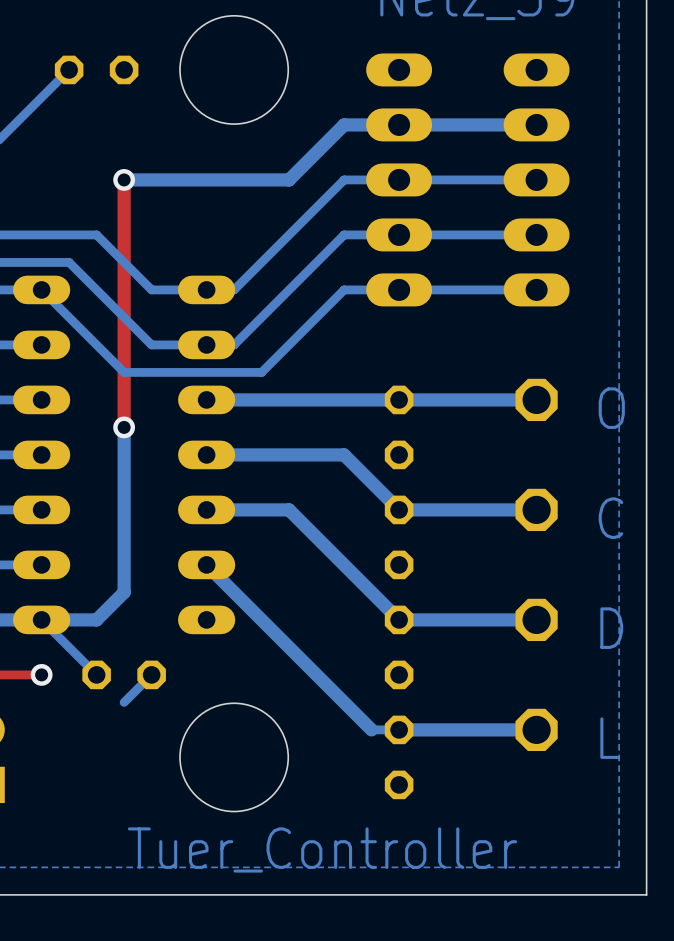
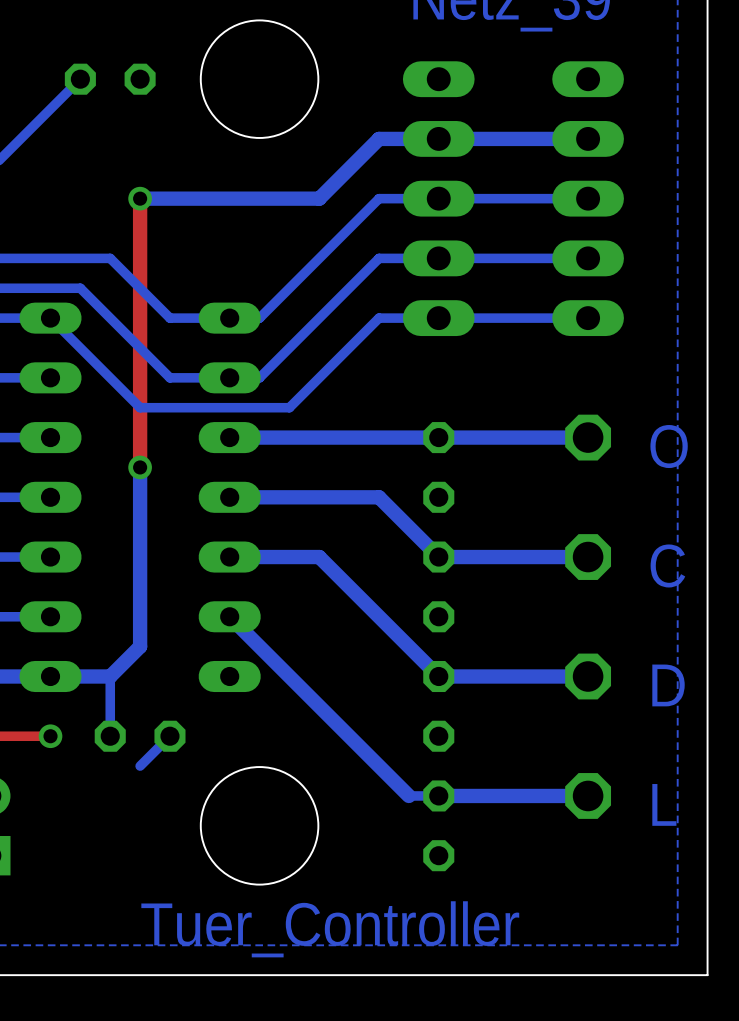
bottom track: (41, 619) (96, 674) -> (110, 676) (110, 736)

